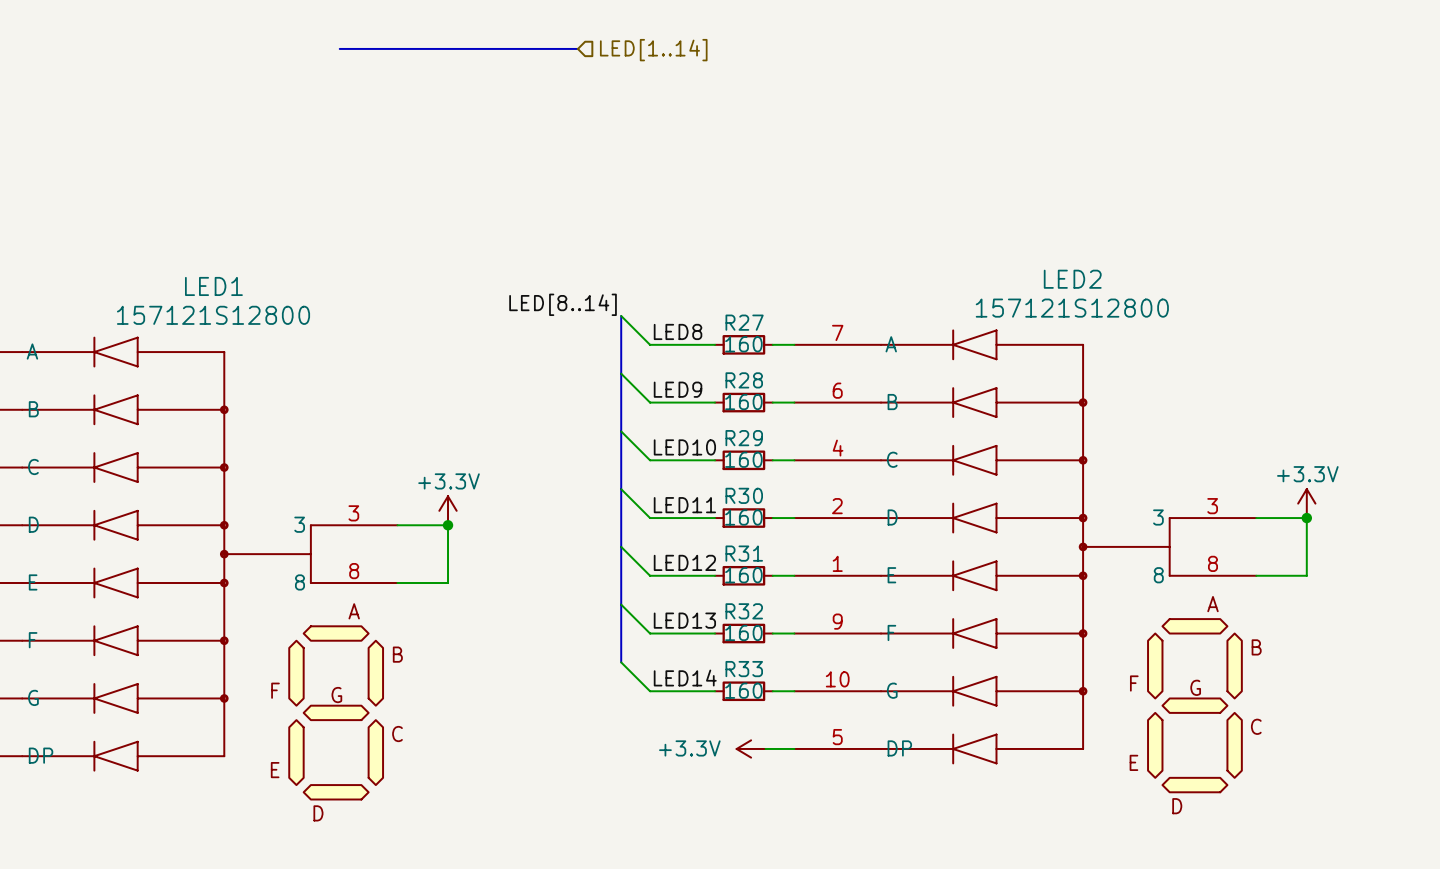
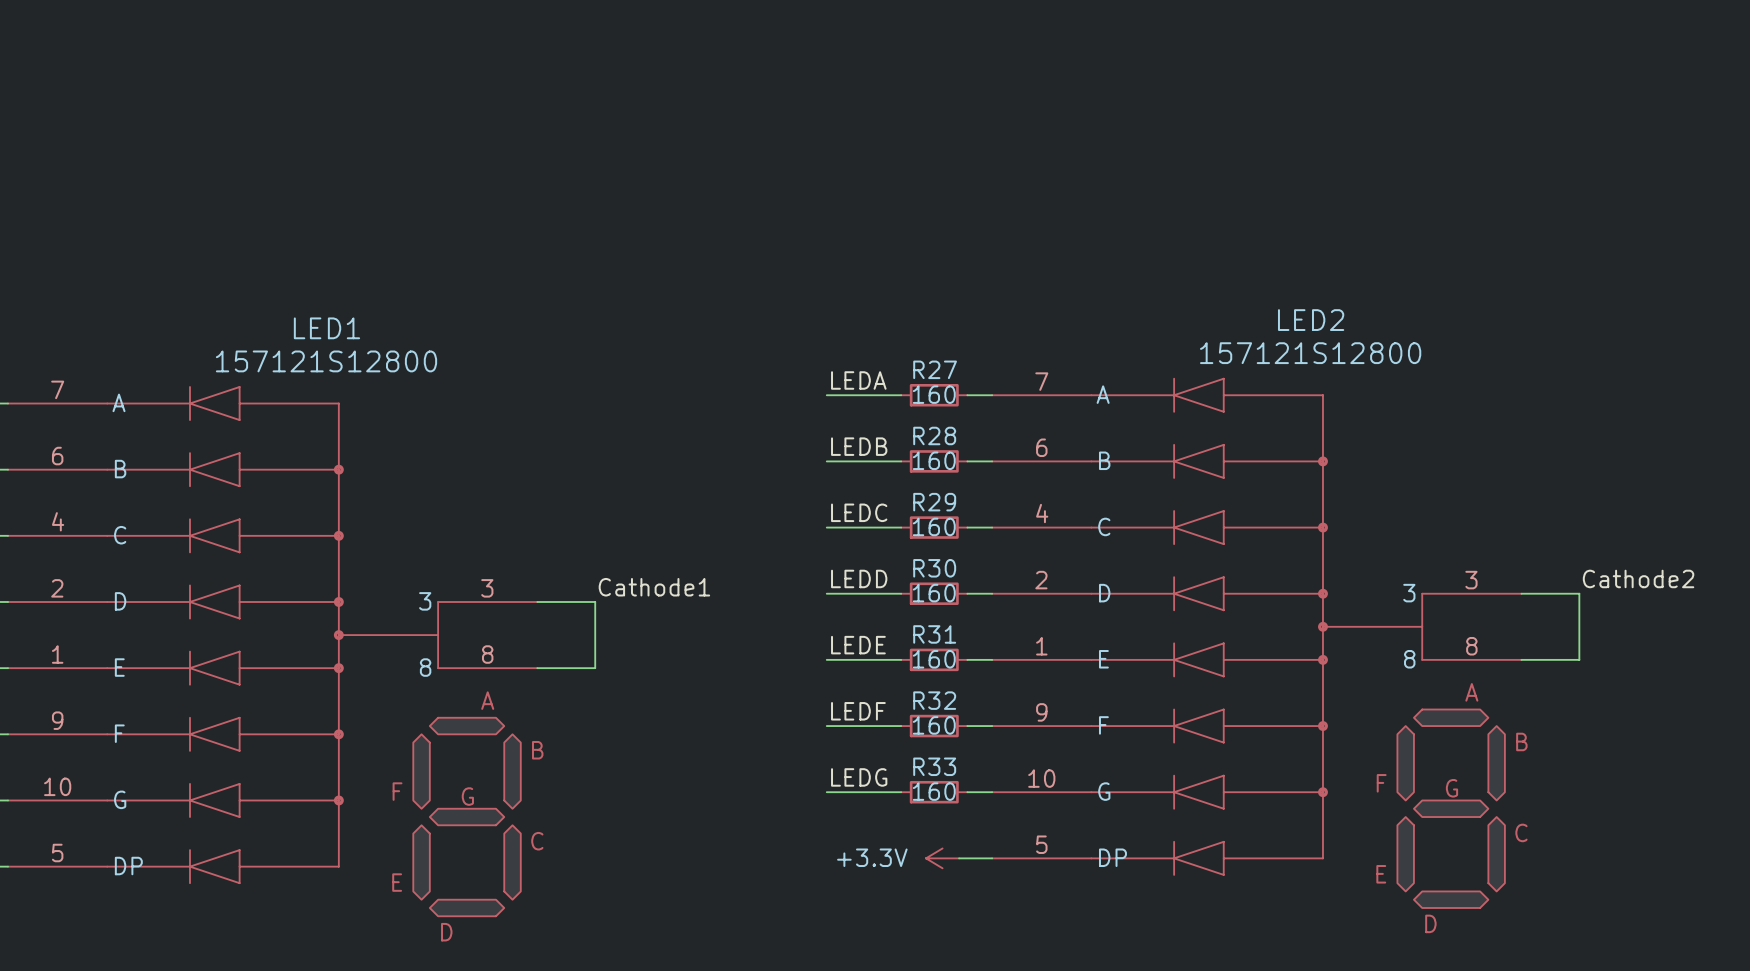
bus: (339, 48) (577, 48) -> none
hierarchical label: LED[1..14] (653, 50) -> none
label: LED[8..14] (563, 304) -> none
wire: (621, 315) (650, 344) -> none
bus: (621, 315) (621, 662) -> none
label: LED8 (678, 331) -> LEDA (858, 380)
wire: (621, 373) (650, 402) -> none
label: LED9 (678, 389) -> LEDB (859, 446)
wire: (621, 431) (650, 460) -> none
label: LED10 (684, 447) -> LEDC (859, 512)
wire: (621, 489) (650, 518) -> none
power symbol: +3.3V (1306, 503) -> none
label: LED11 (684, 505) -> LEDD (859, 578)
label: none -> Cathode2 (1638, 578)
power symbol: +3.3V (448, 510) -> none
label: none -> Cathode1 (654, 587)
junction: (1306, 518) -> none
junction: (448, 525) -> none
wire: (621, 546) (650, 575) -> none
label: LED12 (684, 562) -> LEDE (858, 645)
wire: (621, 604) (650, 633) -> none
label: LED13 (684, 620) -> LEDF (858, 711)
wire: (621, 662) (650, 691) -> none
label: LED14 (685, 678) -> LEDG (859, 777)

